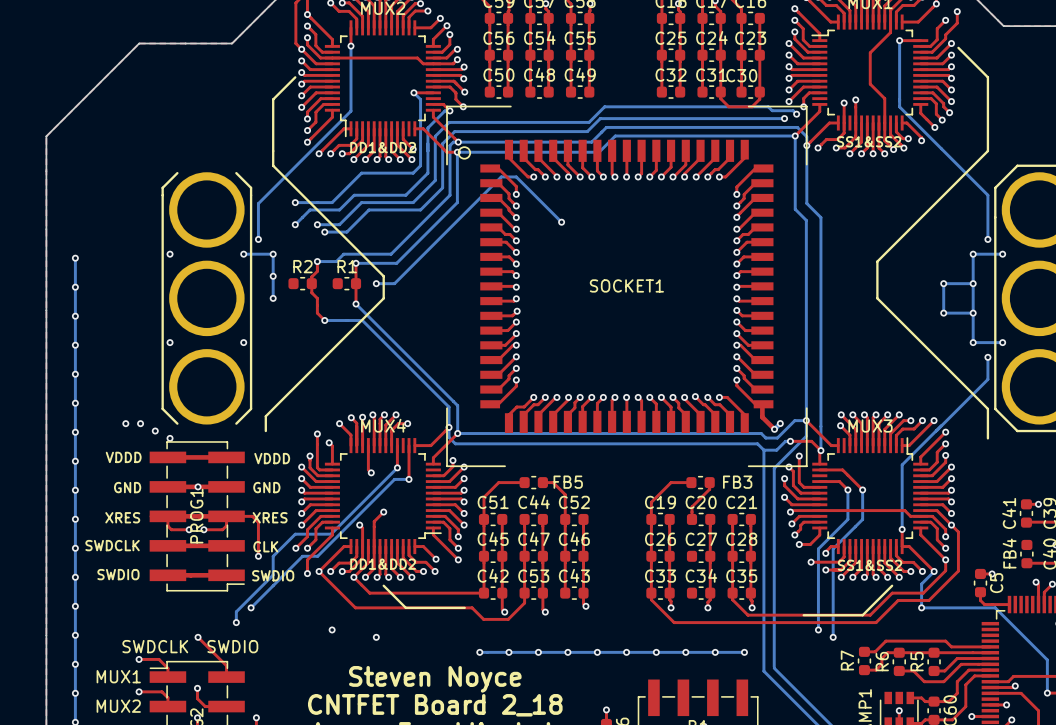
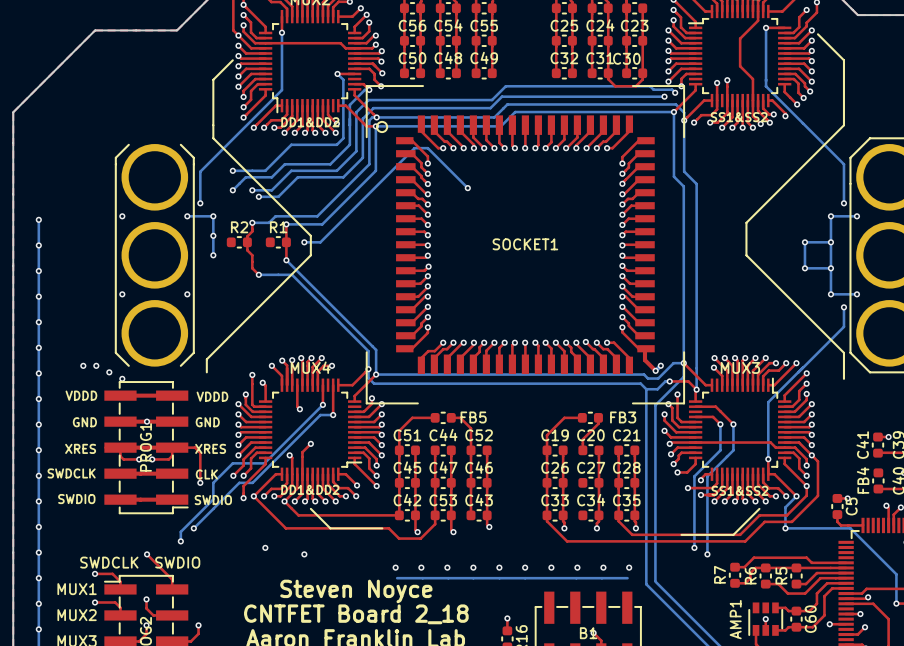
bottom track: (479, 652) (744, 652) -> none
bottom track: none -> (397, 578) (627, 578)

